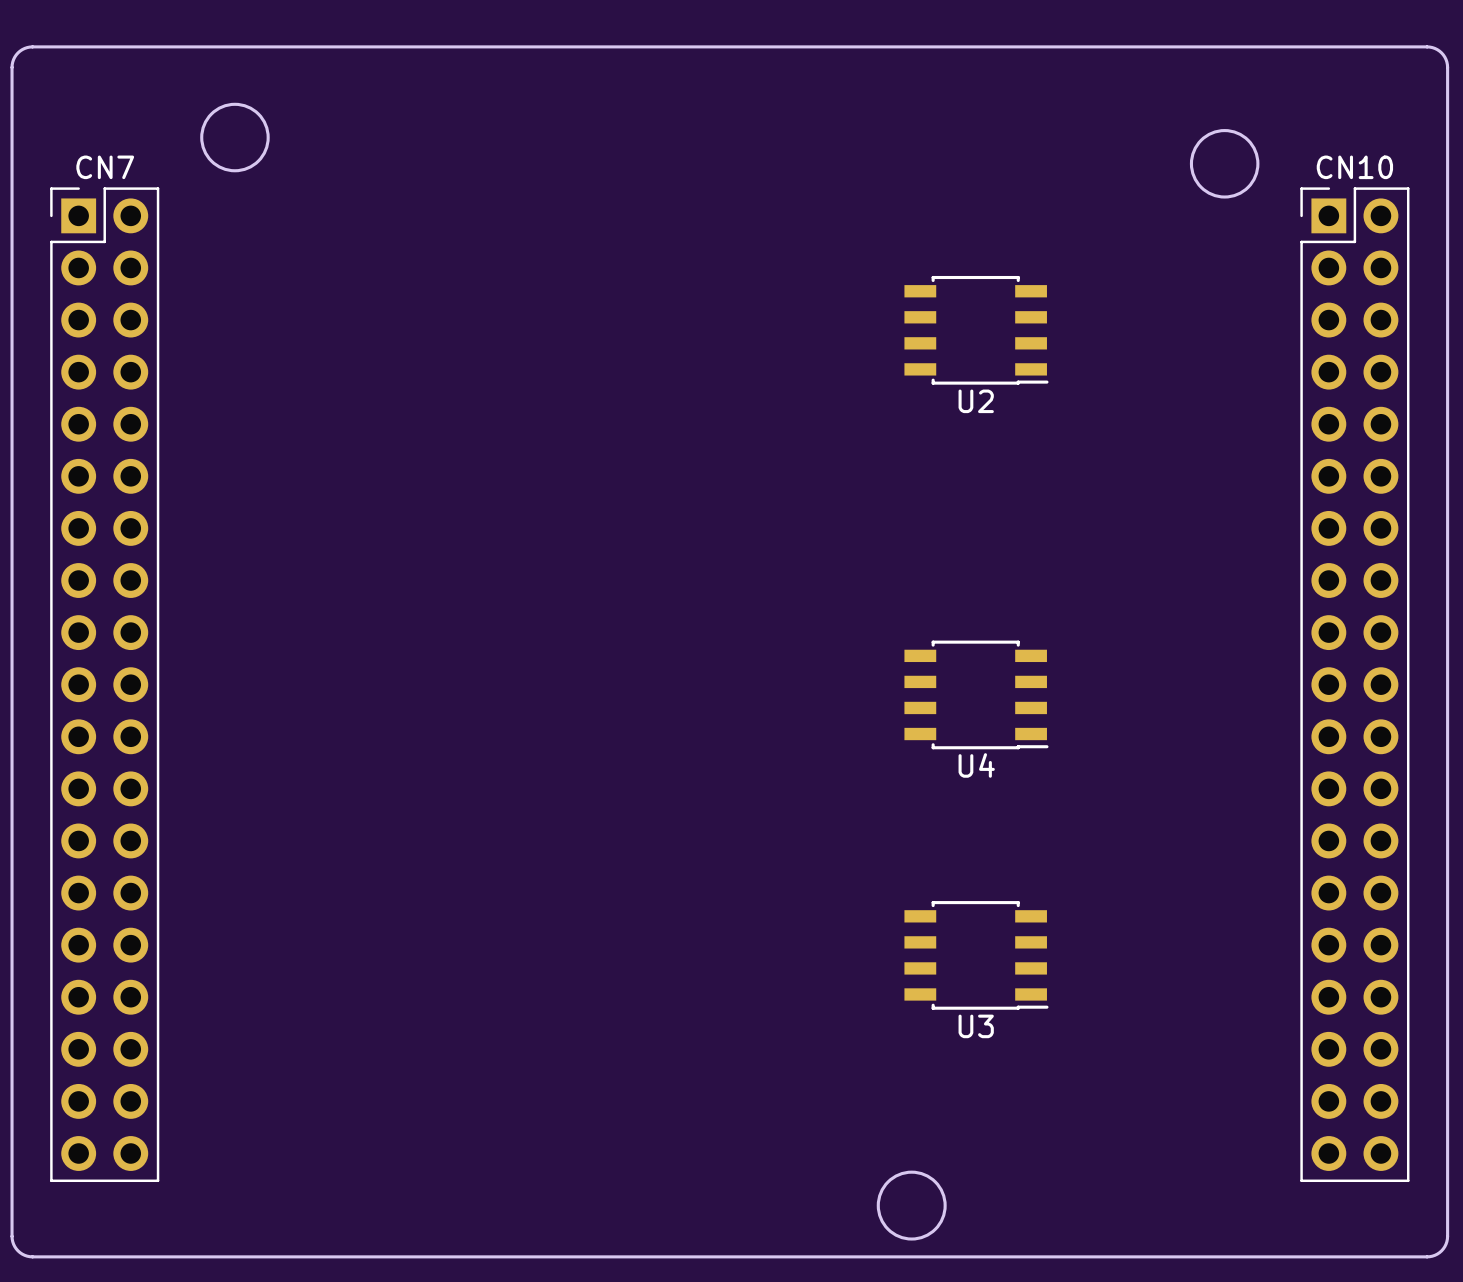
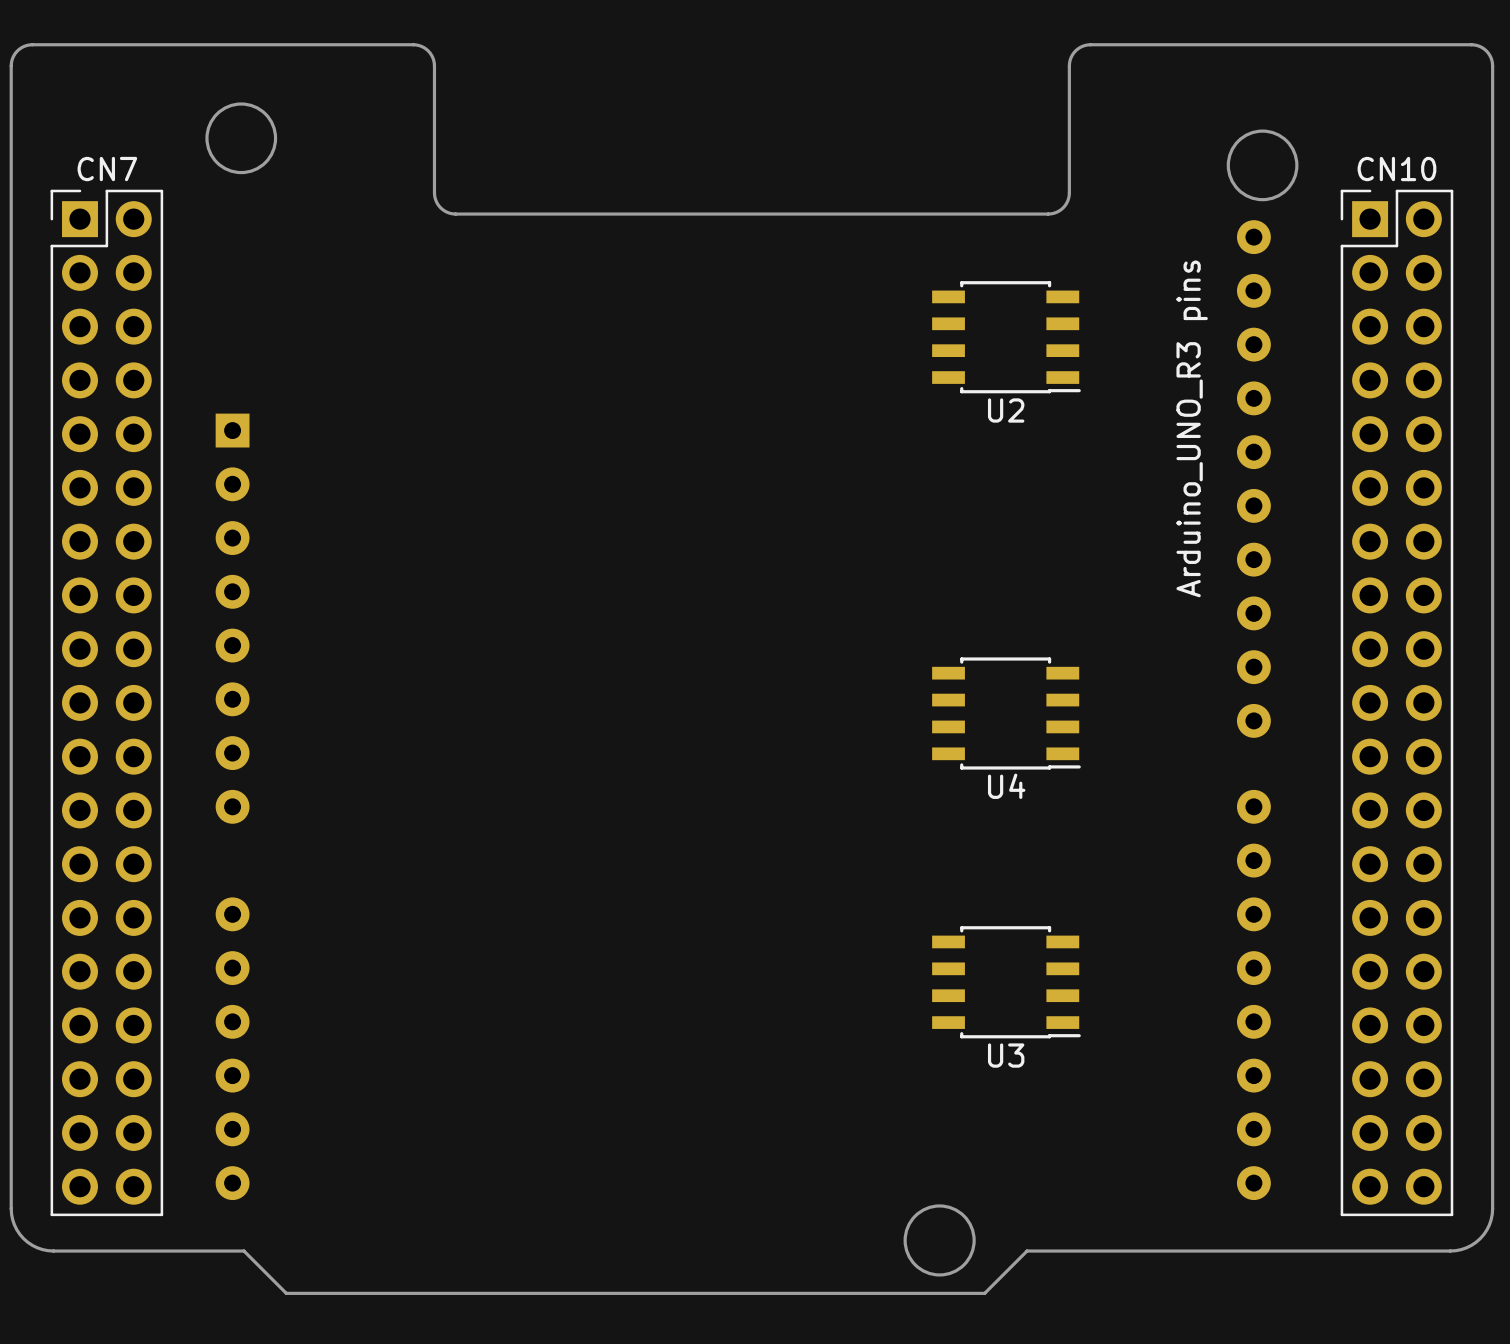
board edge: (401, 46) (1057, 46) -> (413, 44) (426, 49) (433, 60) (434, 195) (440, 207) (447, 212) (455, 214) (1053, 213) (1064, 205) (1069, 195) (1070, 60) (1077, 49) (1090, 44)
Arduino_UNO_R3 pins: none -> (743, 710)
board edge: (12, 1174) (12, 1236) -> none
board edge: (1447, 1174) (1446, 1241) (1439, 1252) (1429, 1256) (955, 1256) -> (1492, 1208) (1489, 1224) (1480, 1238) (1471, 1245) (1455, 1250) (1027, 1251) (984, 1293)
board edge: (12, 1236) (13, 1244) (18, 1250) (29, 1256) (278, 1256) -> (11, 1208) (14, 1224) (19, 1234) (32, 1245) (42, 1249) (244, 1251) (286, 1293)

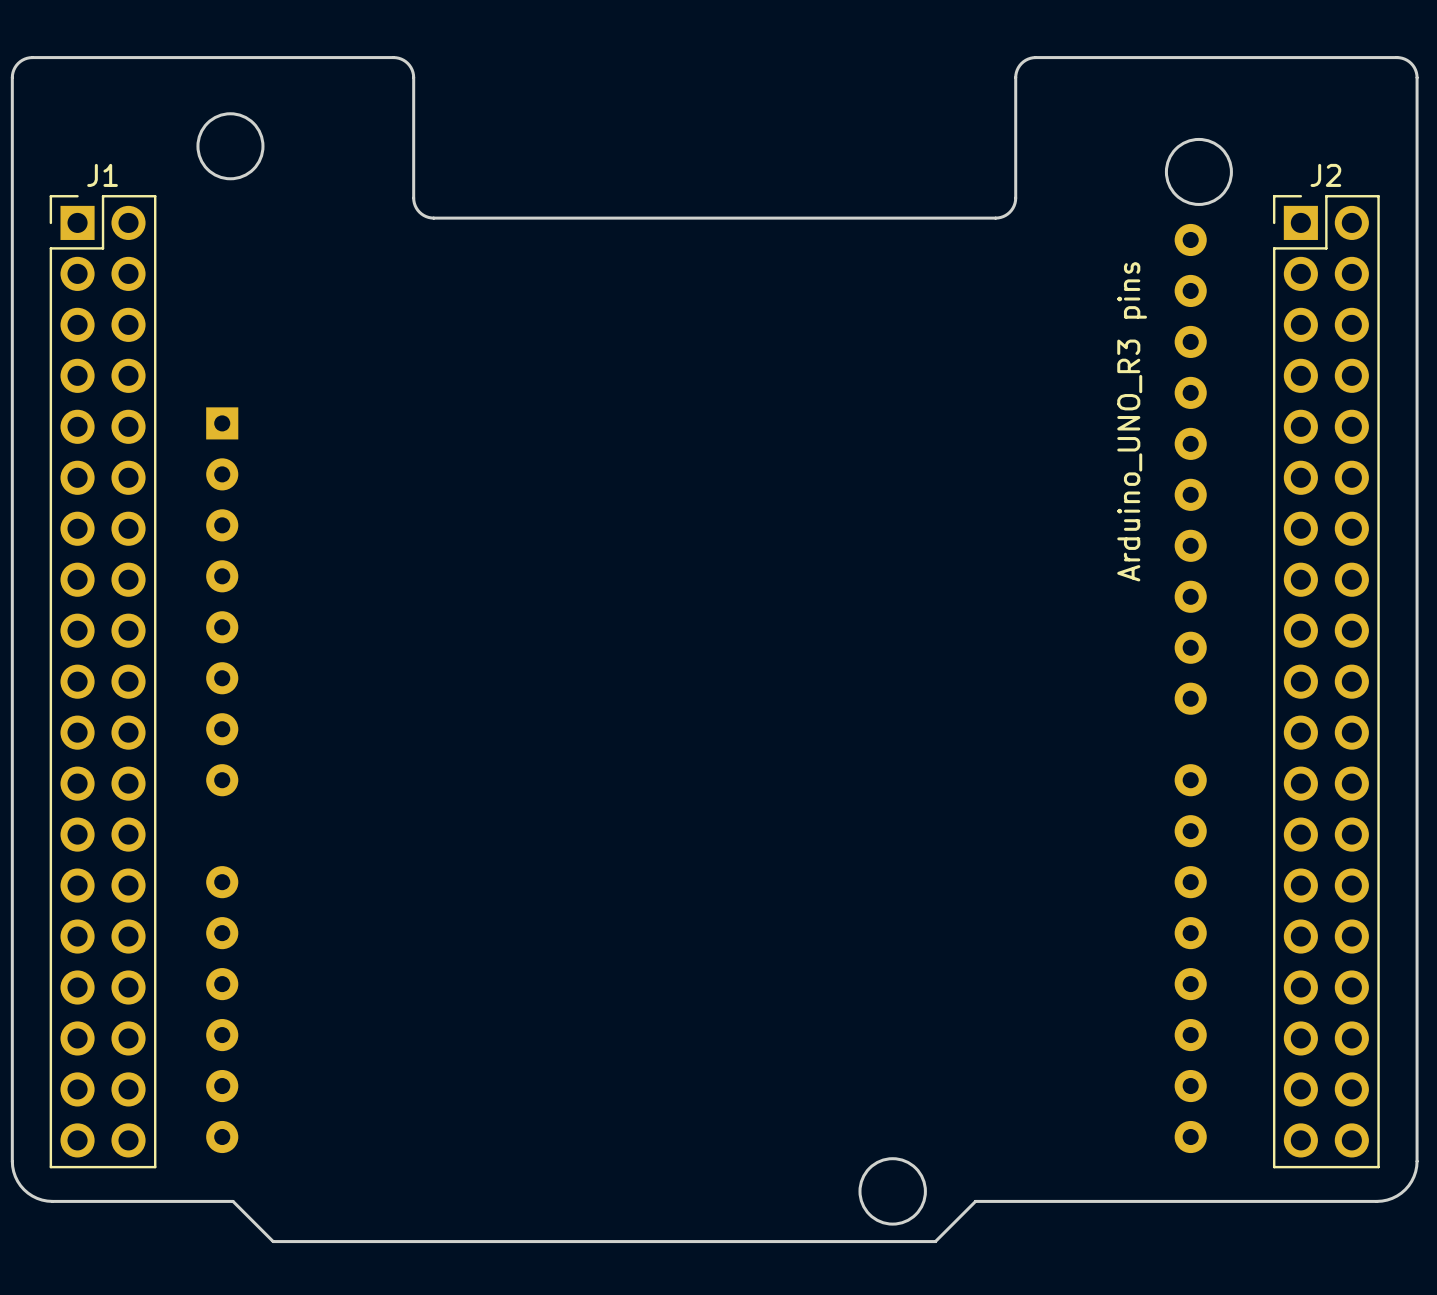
CN7 name: CN7 (107, 169) -> J1 (102, 175)
CN10 name: CN10 (1396, 169) -> J2 (1325, 175)
U2: (1006, 337) -> none
U4: (1006, 713) -> none
U3: (1006, 982) -> none

